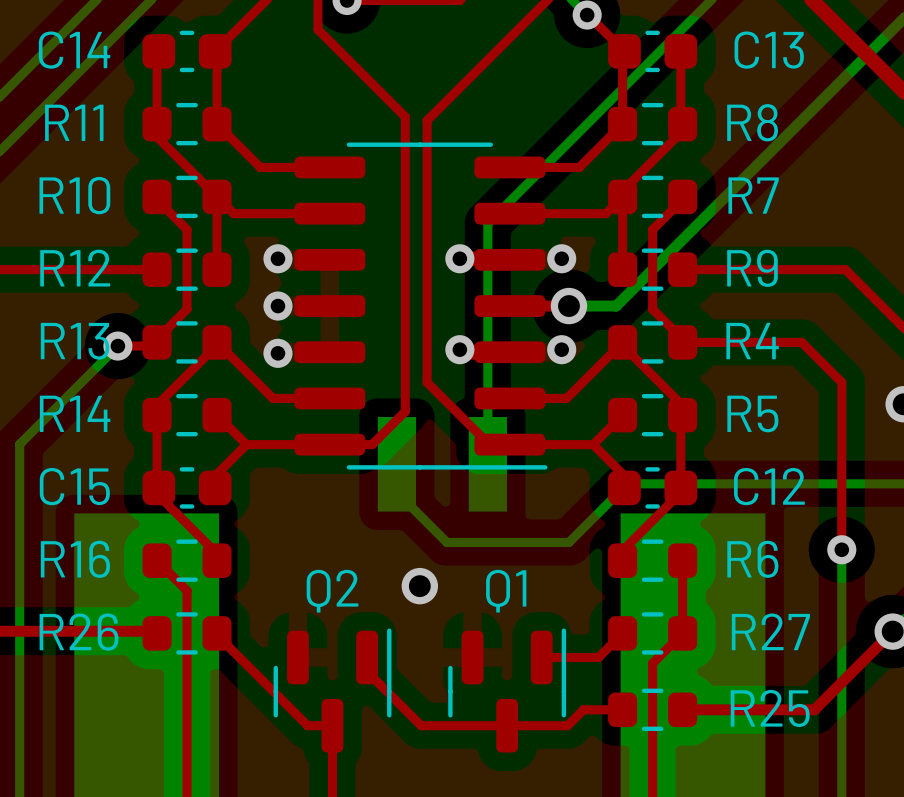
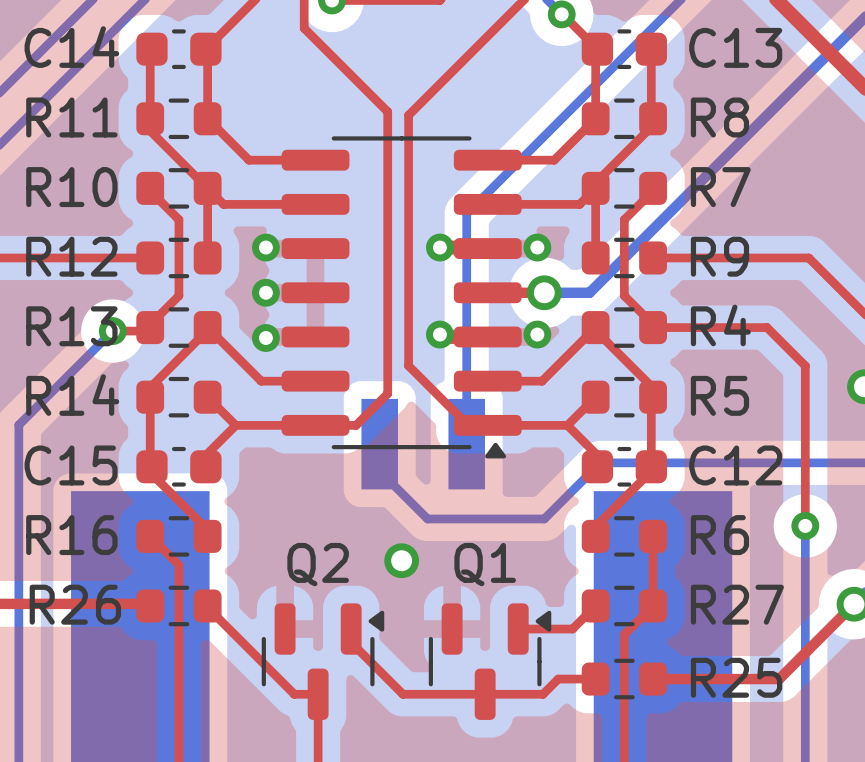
part footprint: [294, 142, 548, 470] -> [281, 136, 522, 459]
Q2 footprint: [273, 628, 392, 753] -> [261, 603, 385, 720]
Q1 footprint: [448, 628, 567, 753] -> [428, 603, 552, 720]

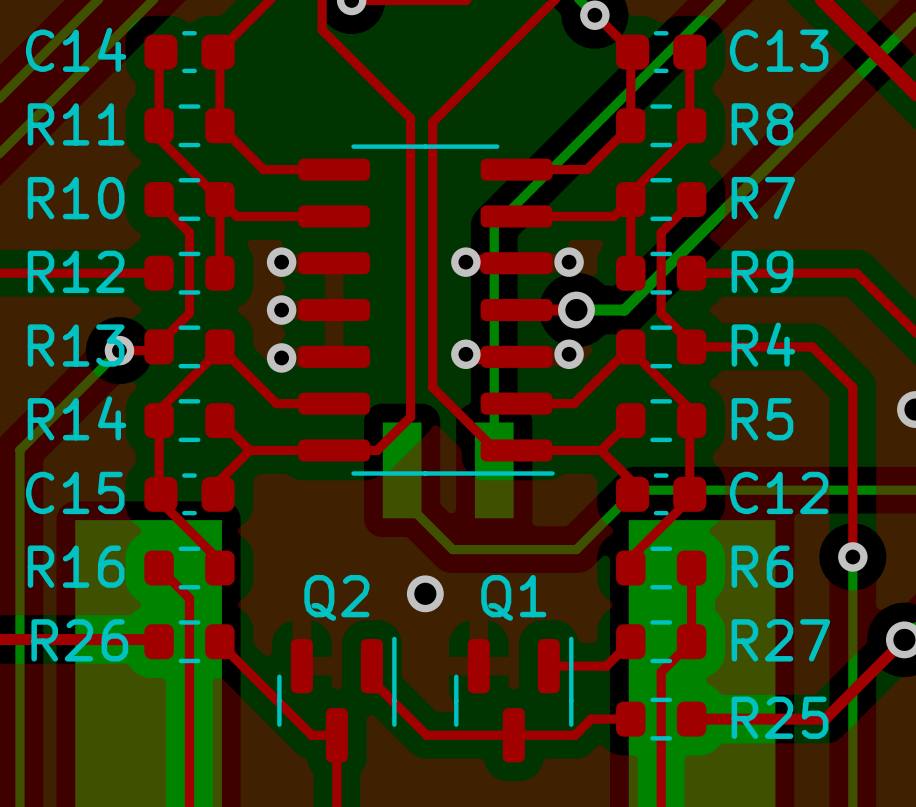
part footprint: [281, 136, 522, 459] -> [298, 144, 555, 476]
Q2 footprint: [261, 603, 385, 720] -> [277, 636, 397, 763]
Q1 footprint: [428, 603, 552, 720] -> [454, 636, 574, 763]

